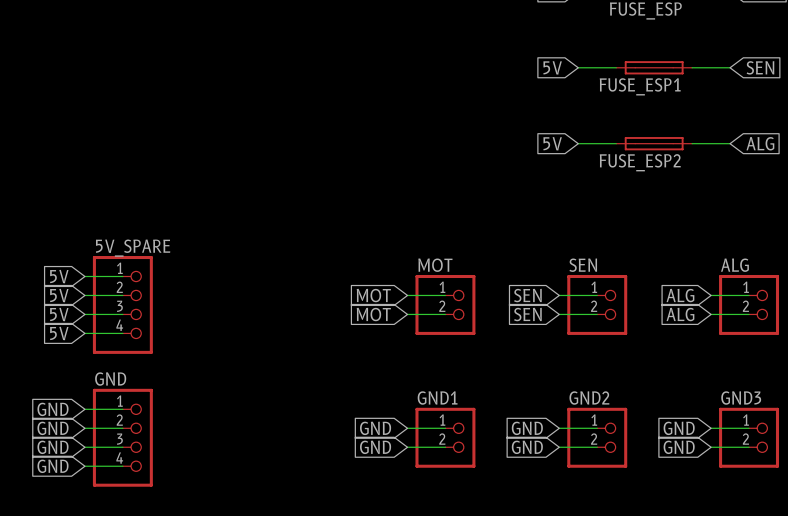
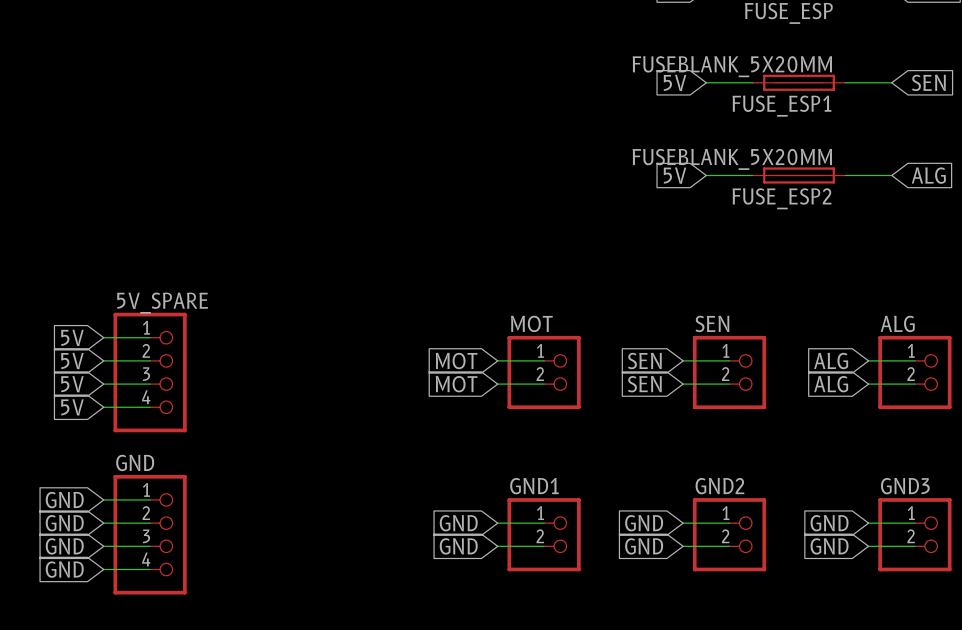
FUSE_ESP1 value: none -> FUSEBLANK_5X20MM (732, 66)
FUSE_ESP2 value: none -> FUSEBLANK_5X20MM (732, 159)

